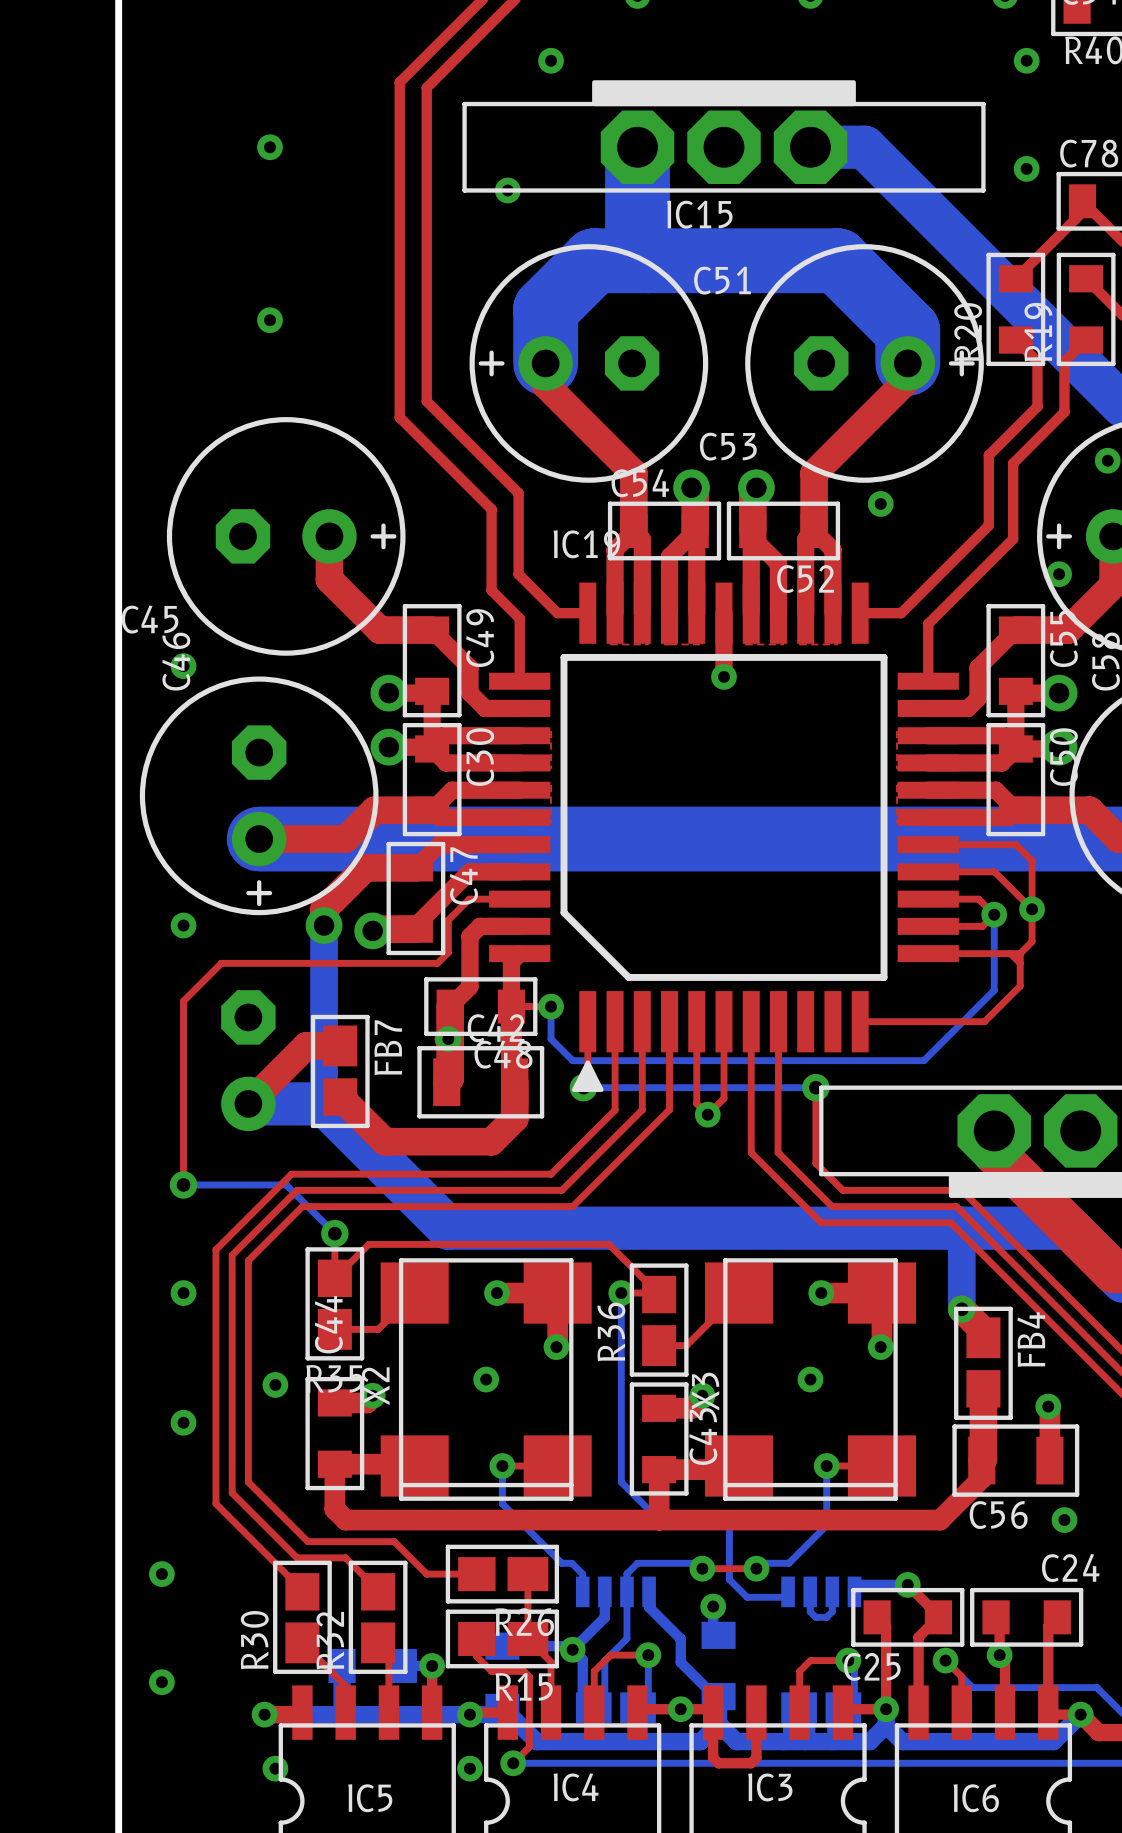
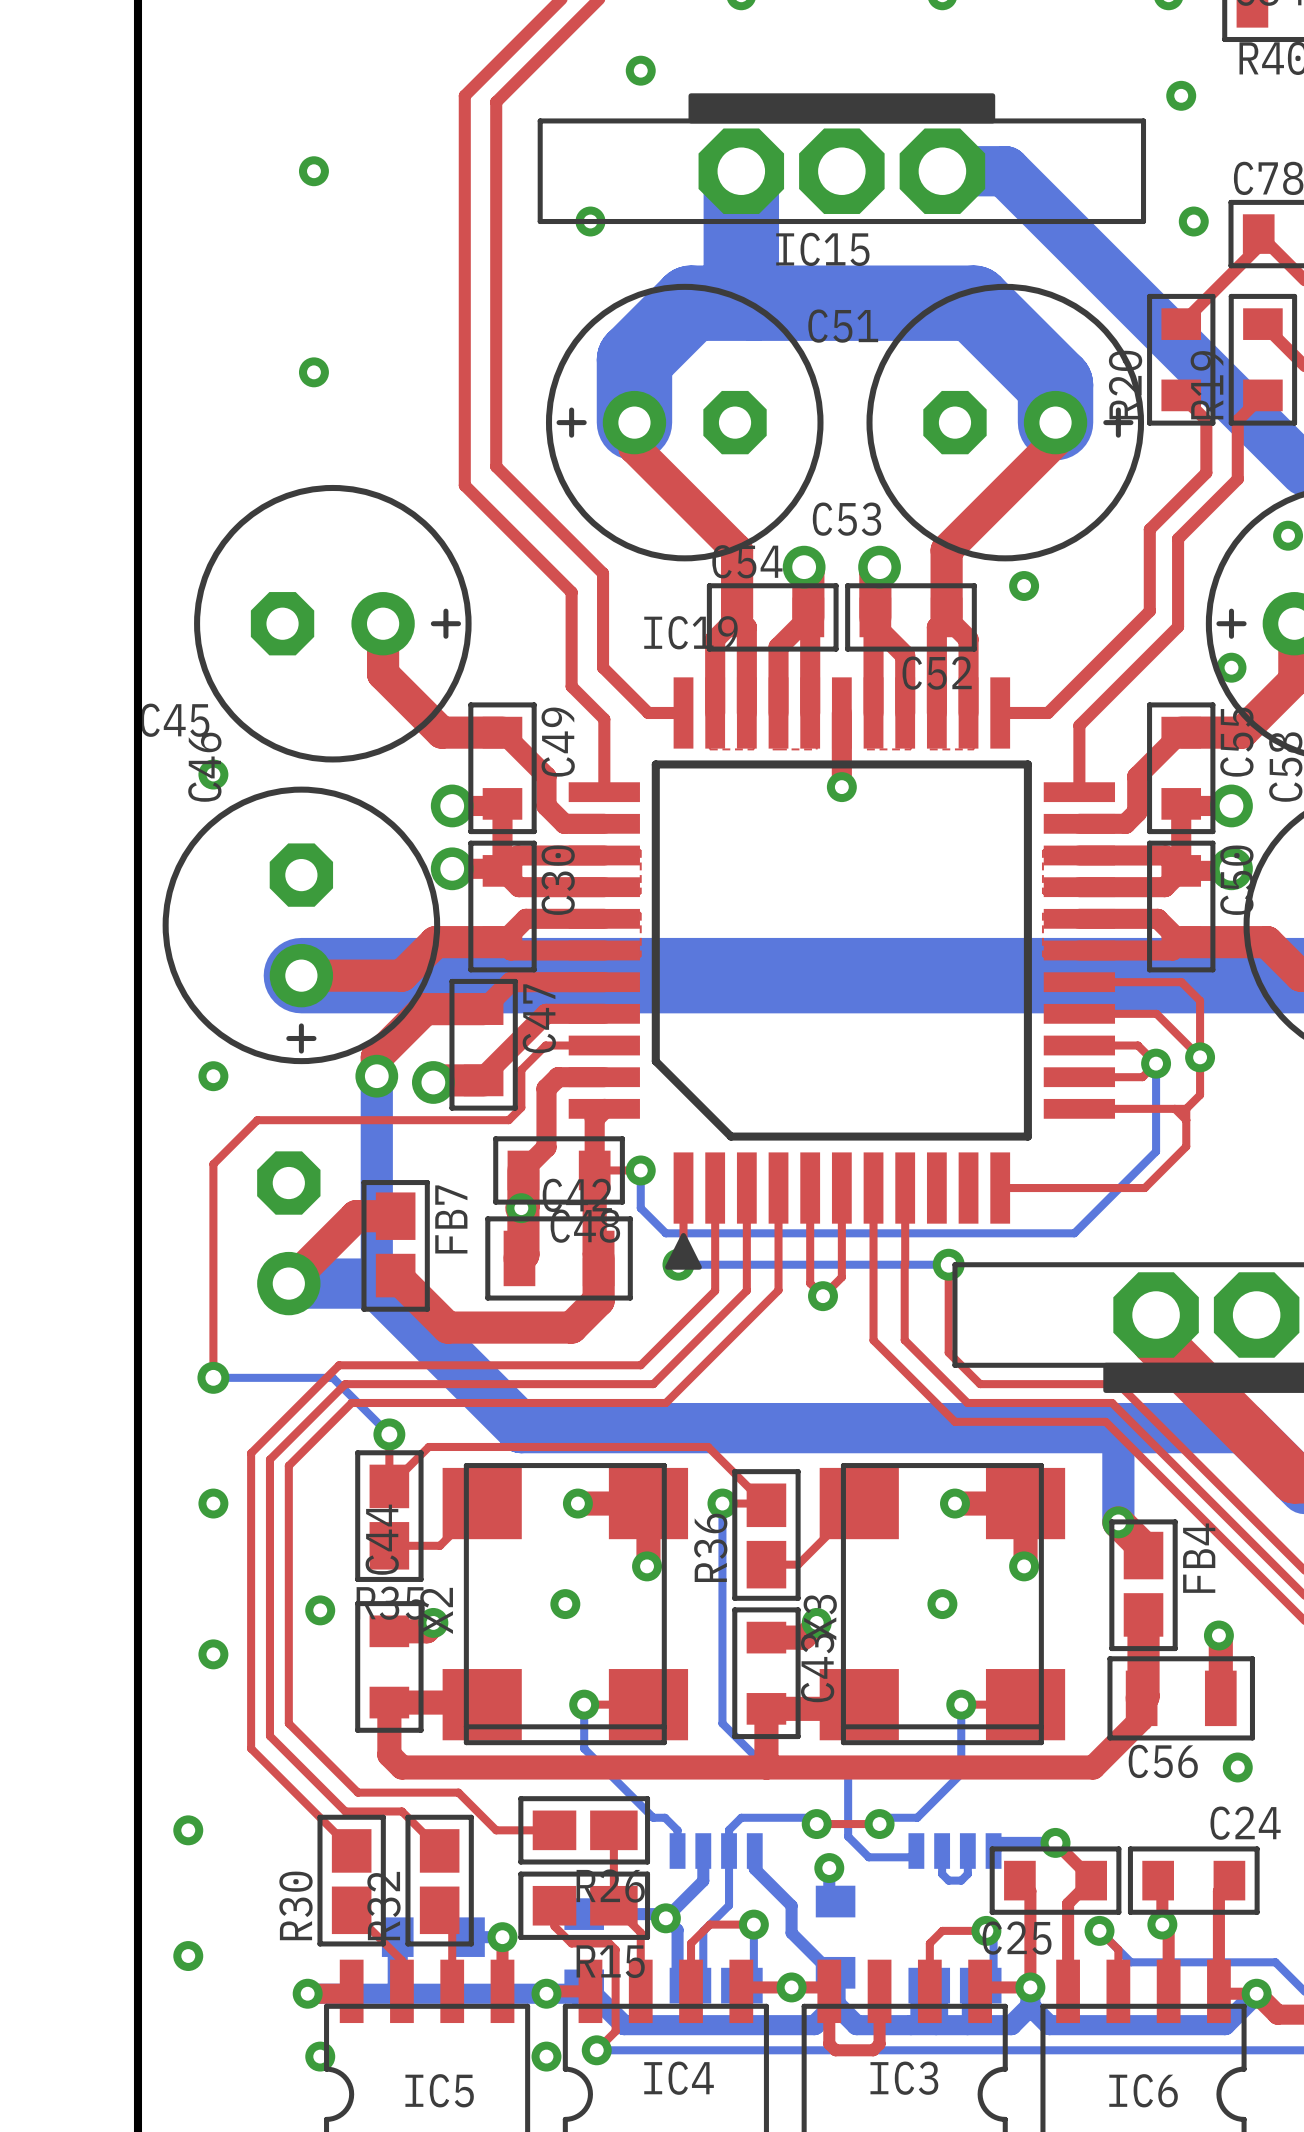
via position: (1026, 60) -> (1181, 95)
via position: (1026, 168) -> (1193, 221)

